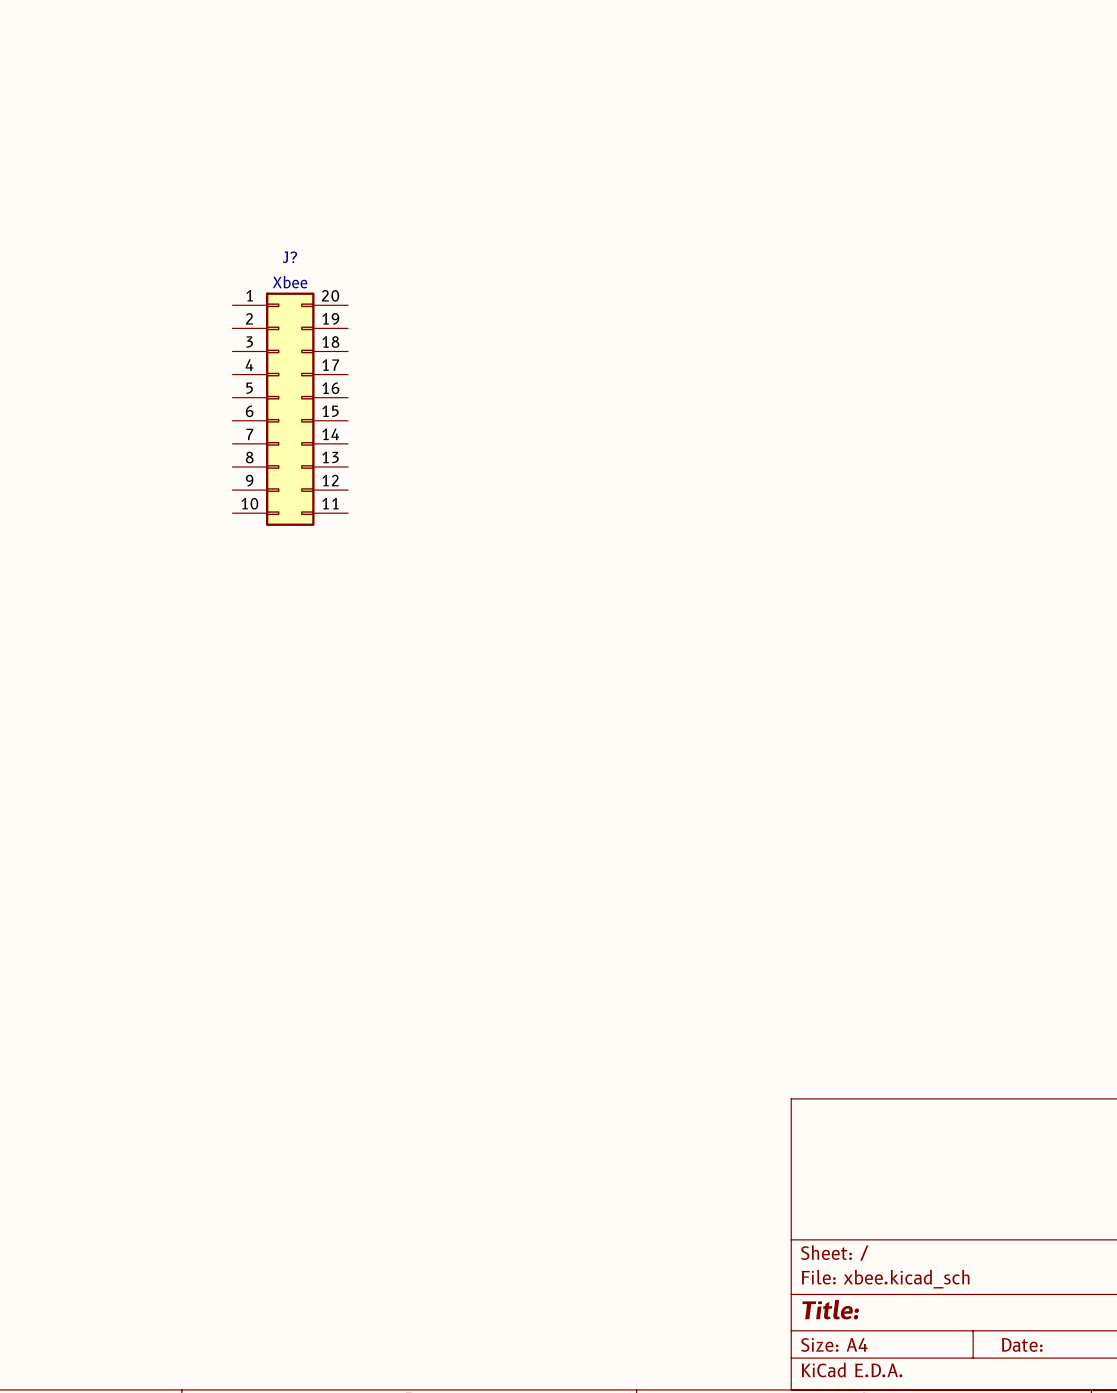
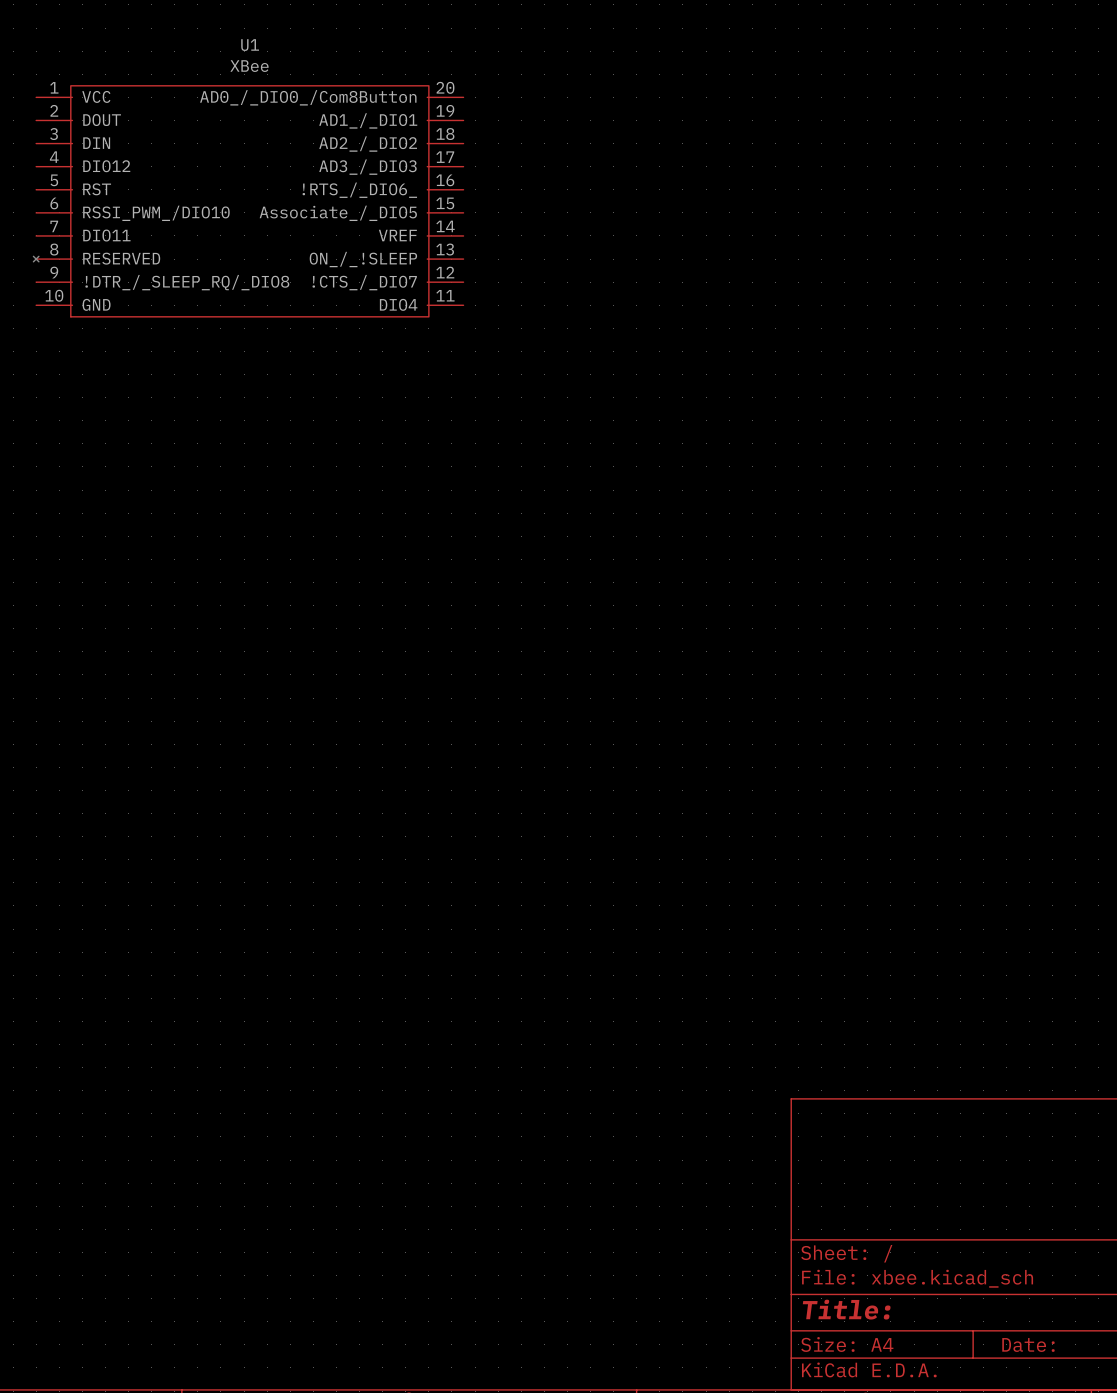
U1: none -> XBee (248, 201)
J?: Xbee (290, 409) -> none

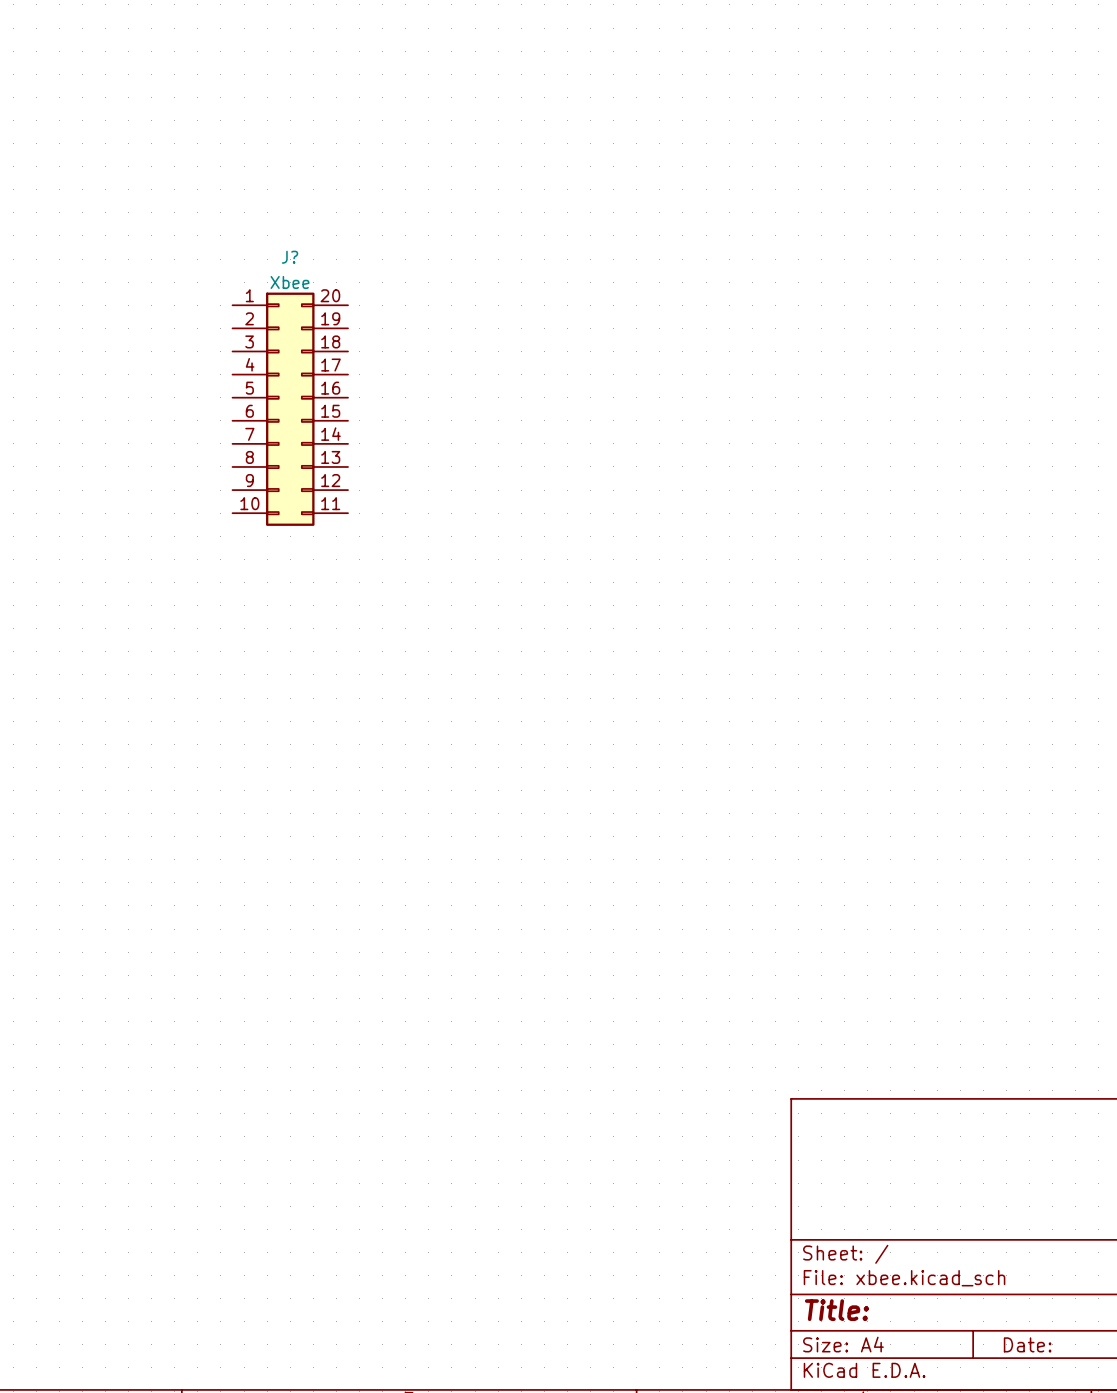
U1: XBee (248, 201) -> none
J?: none -> Xbee (290, 409)

